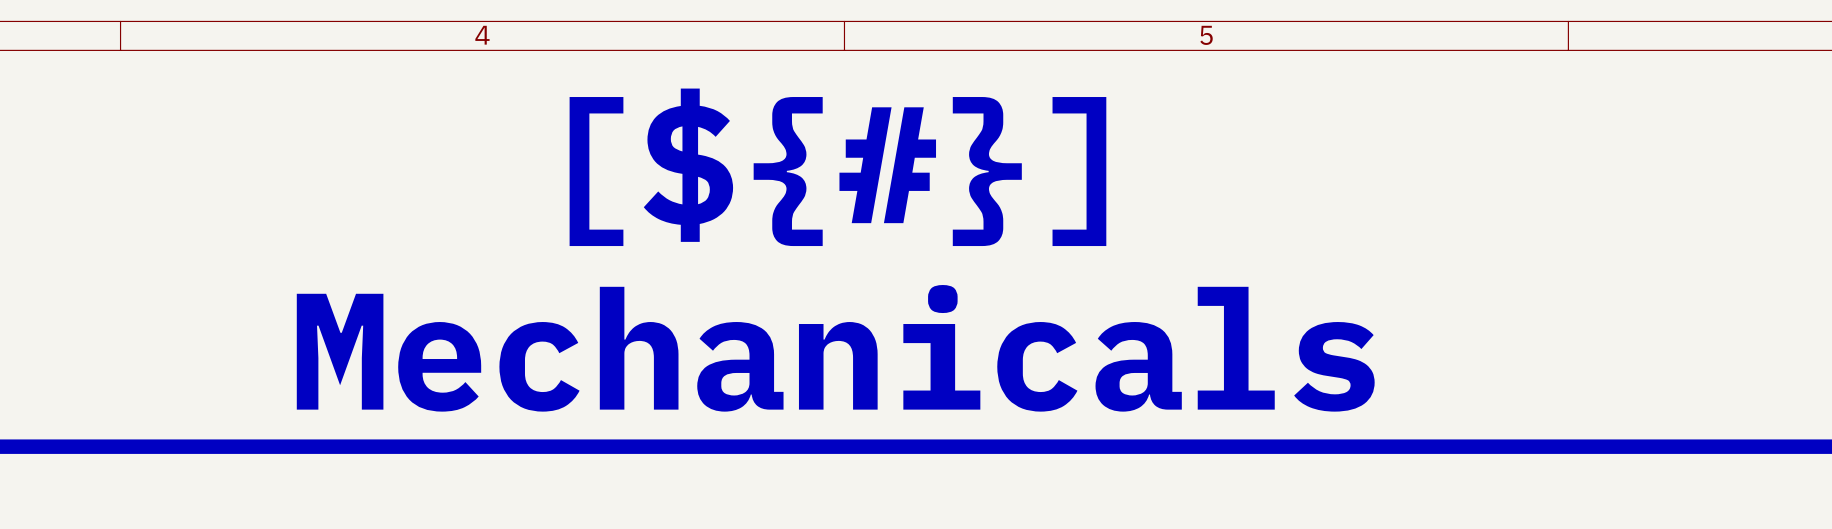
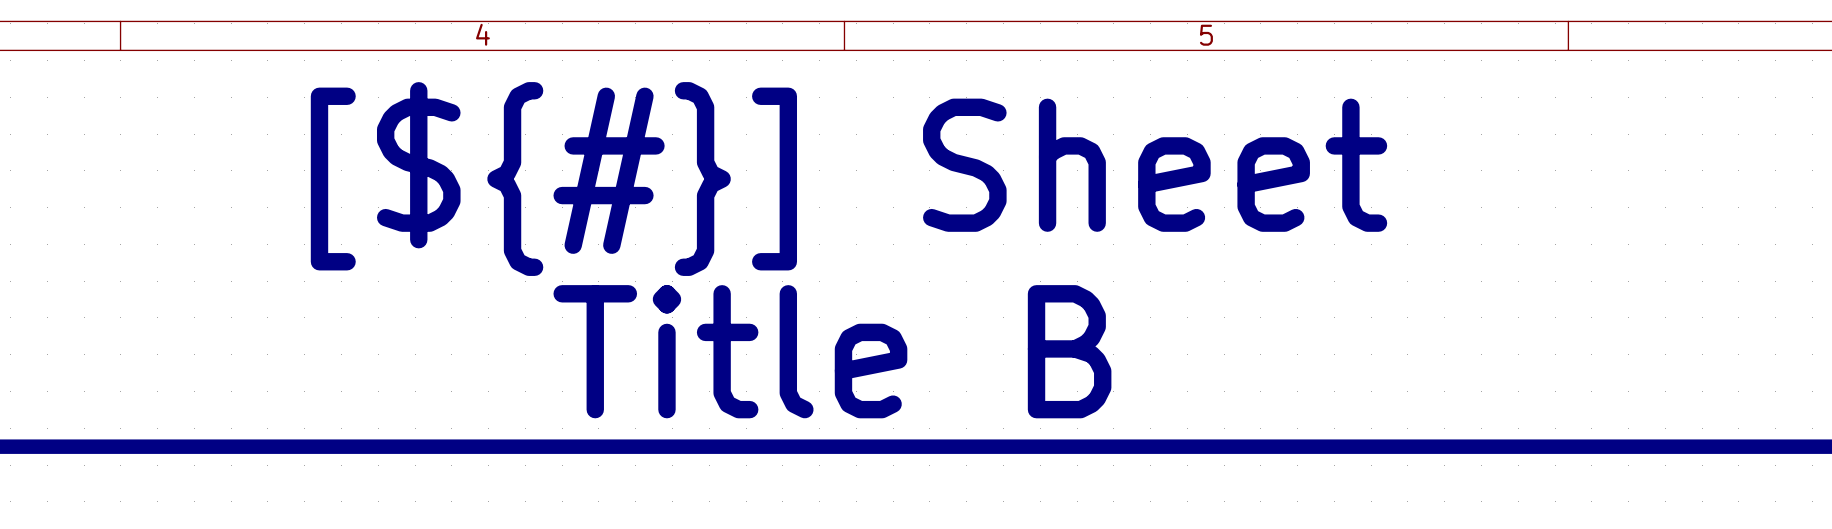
text: [${#}] (837, 167) -> [${#}] Sheet (848, 179)
text: Mechanicals (835, 348) -> Title B (832, 351)

